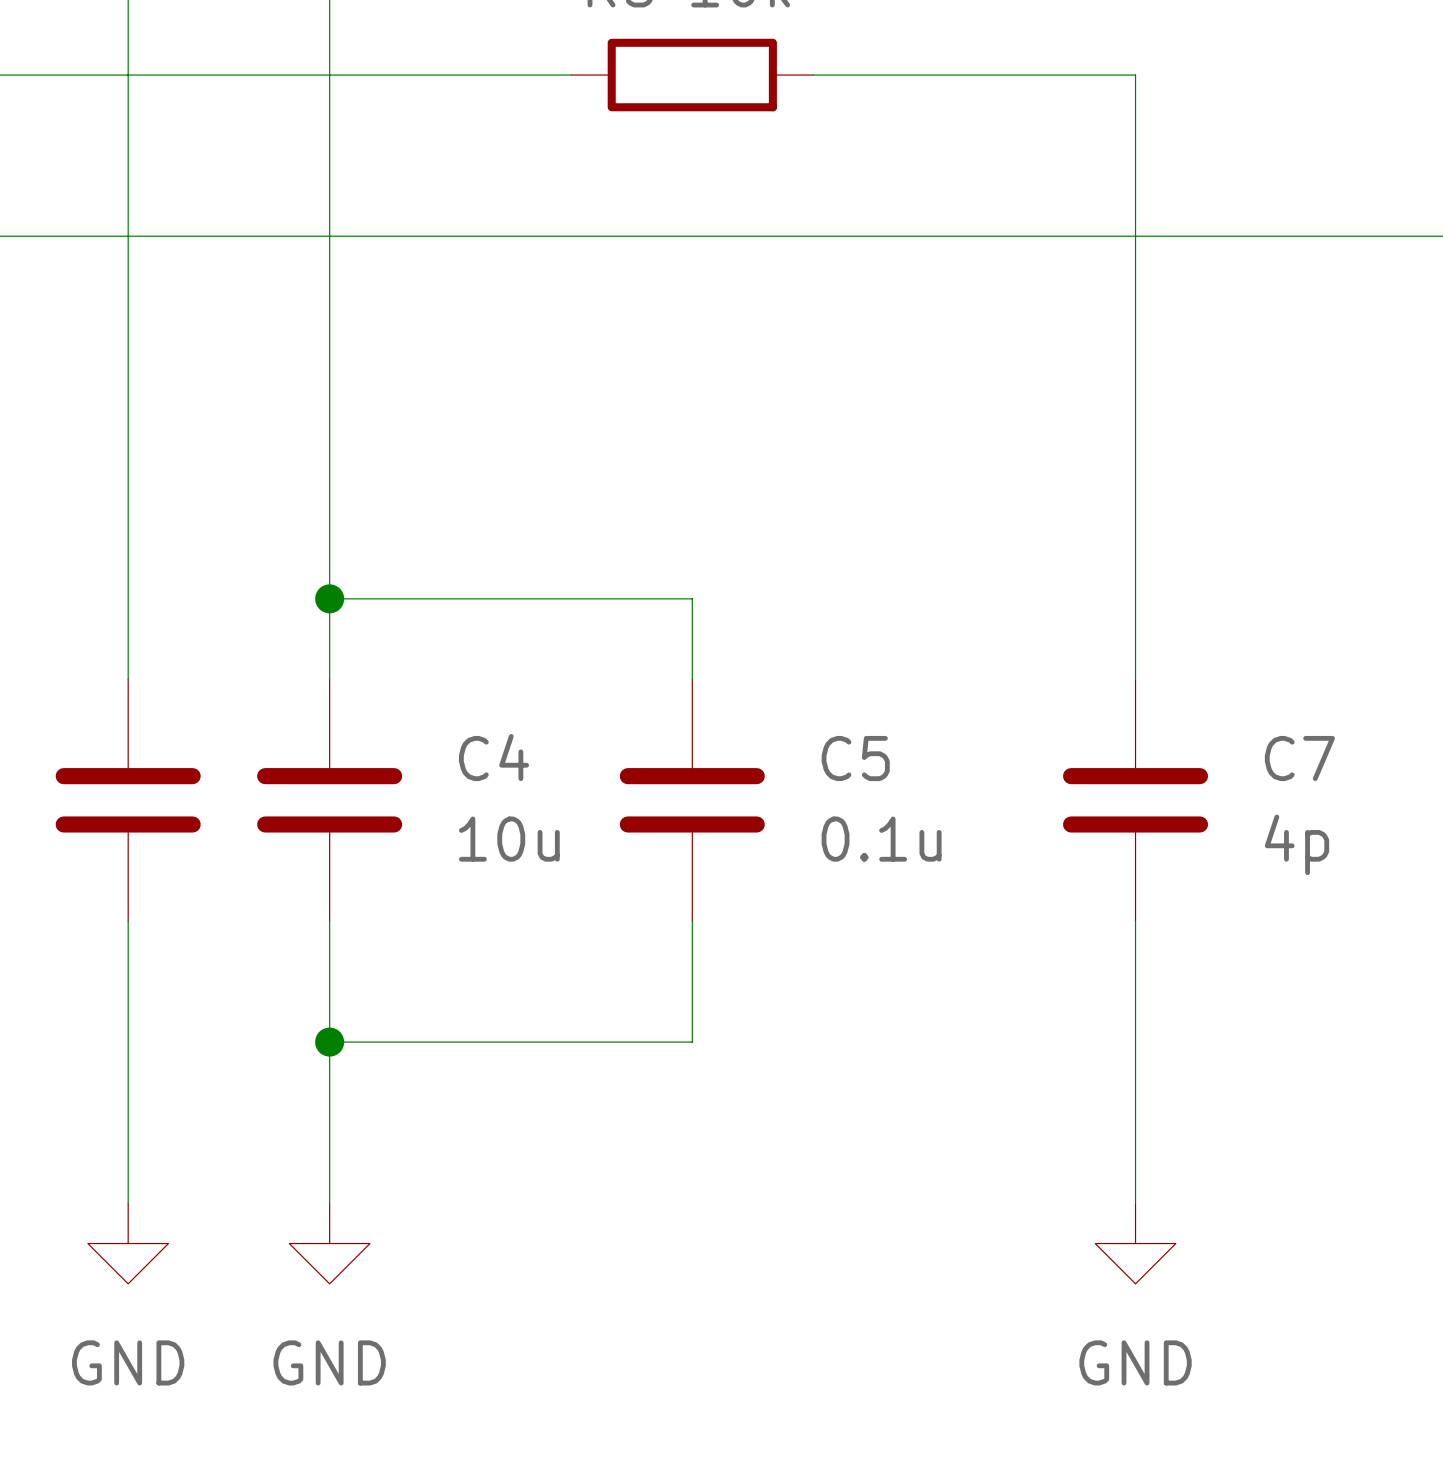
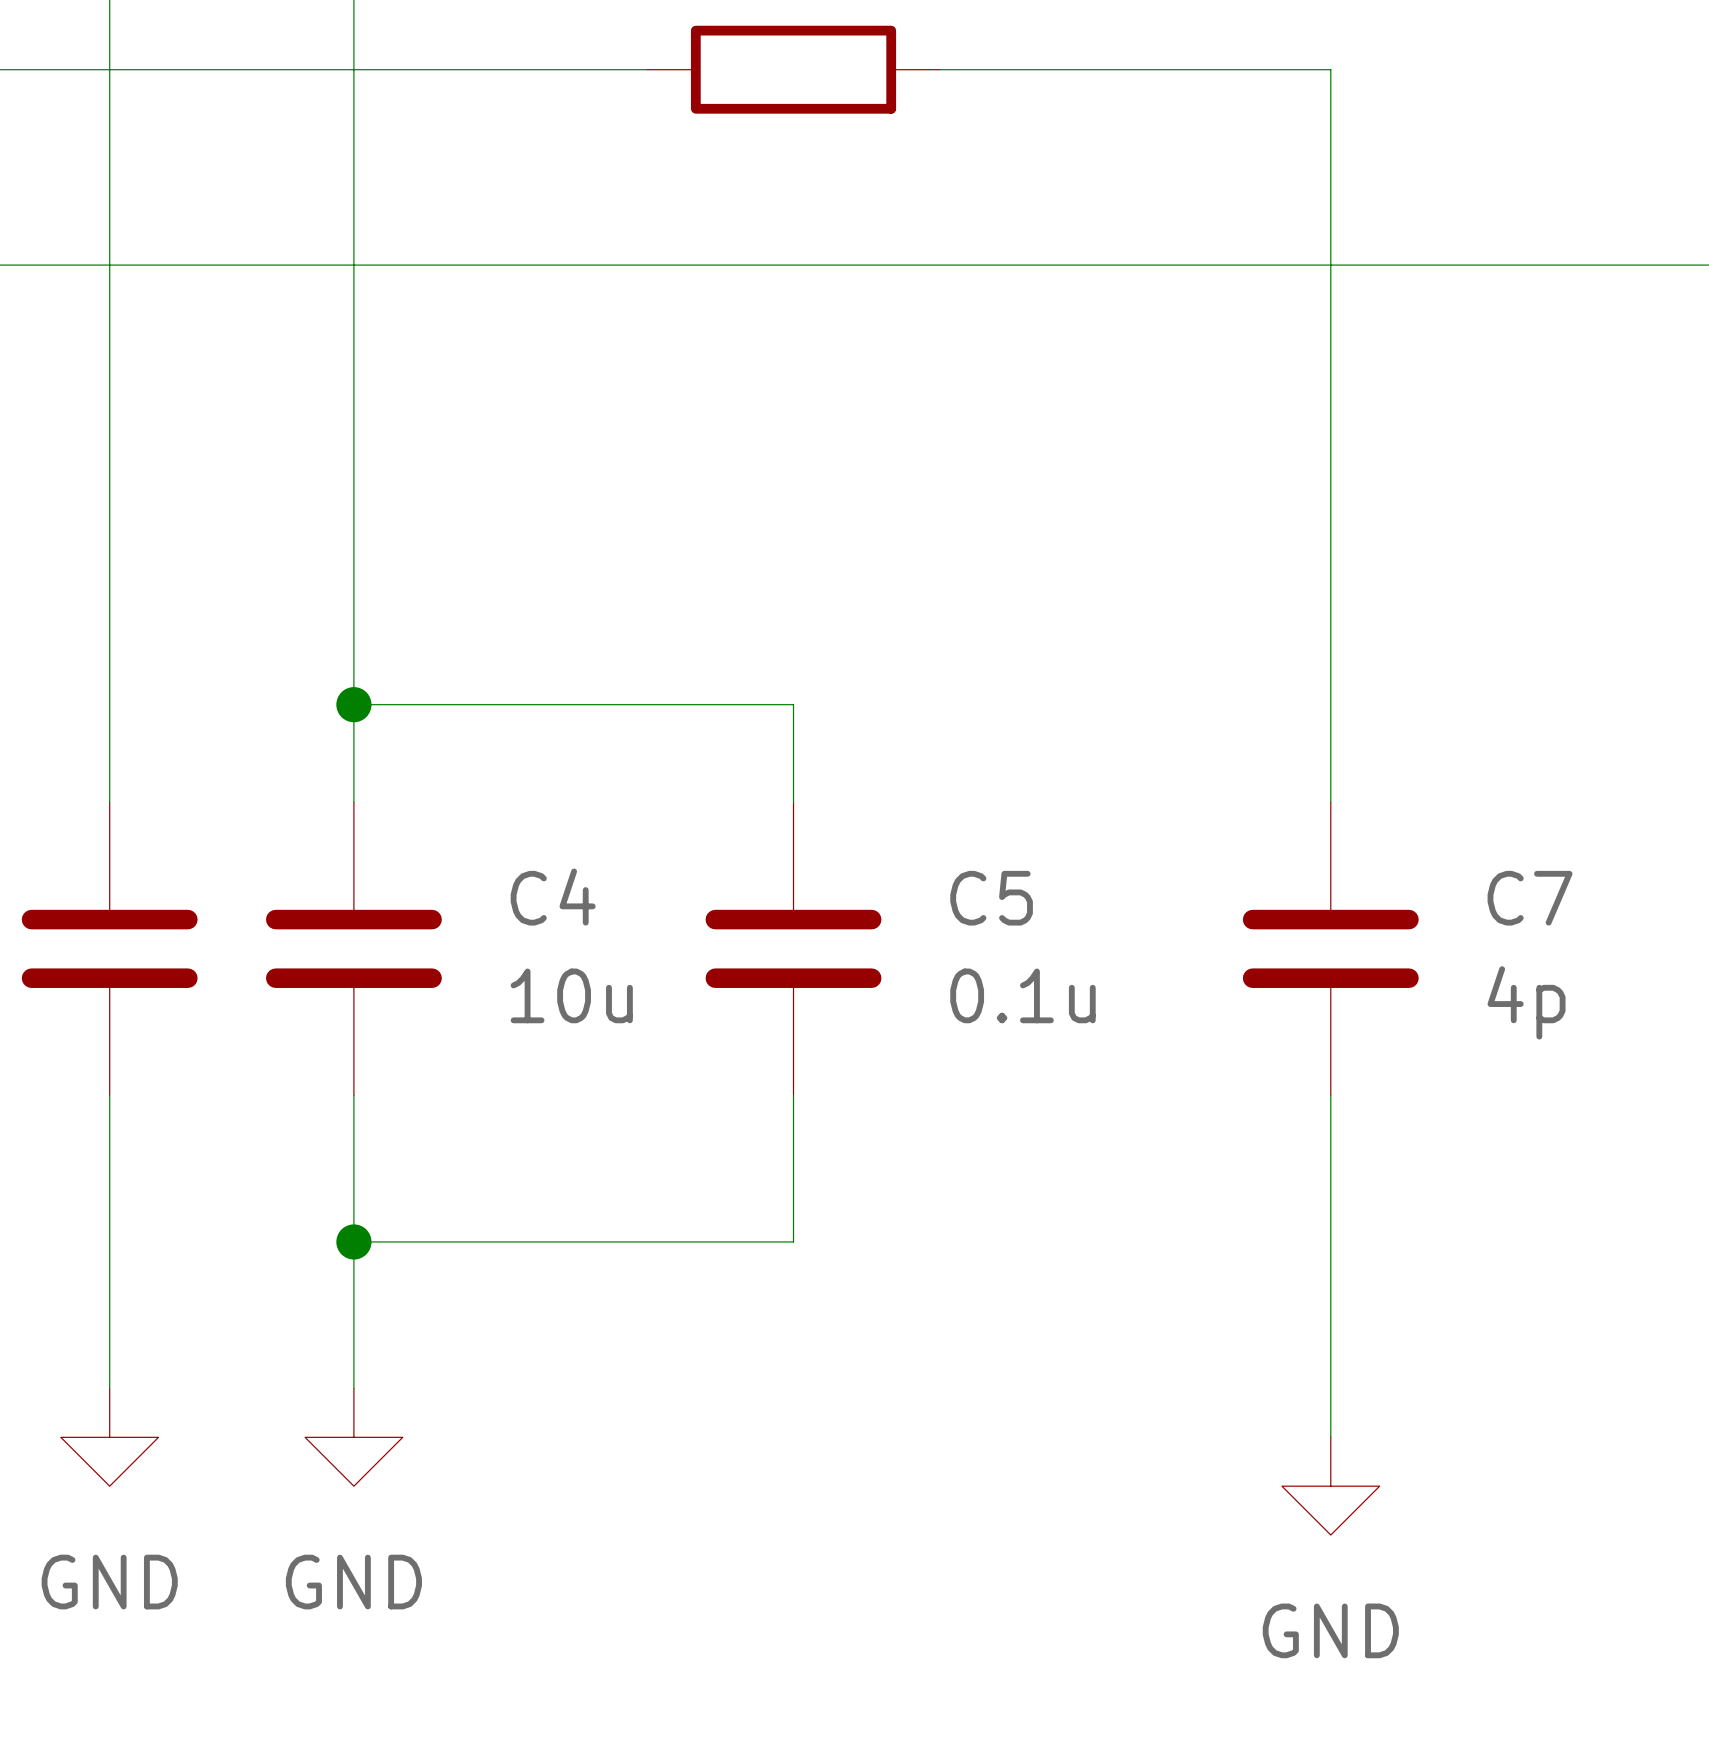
power symbol position: GND (128, 1243) -> GND (109, 1437)
power symbol position: GND (329, 1243) -> GND (353, 1437)

